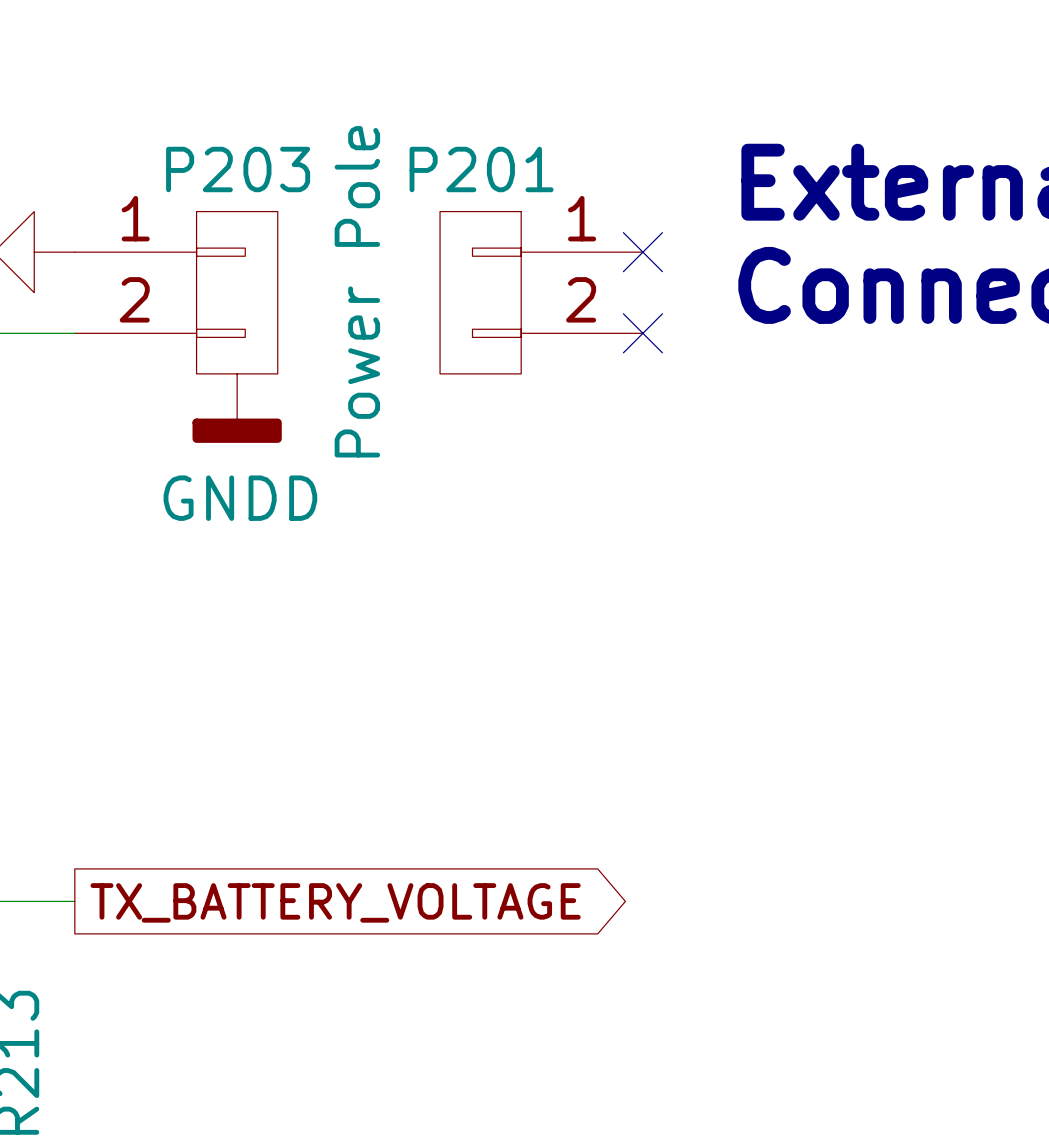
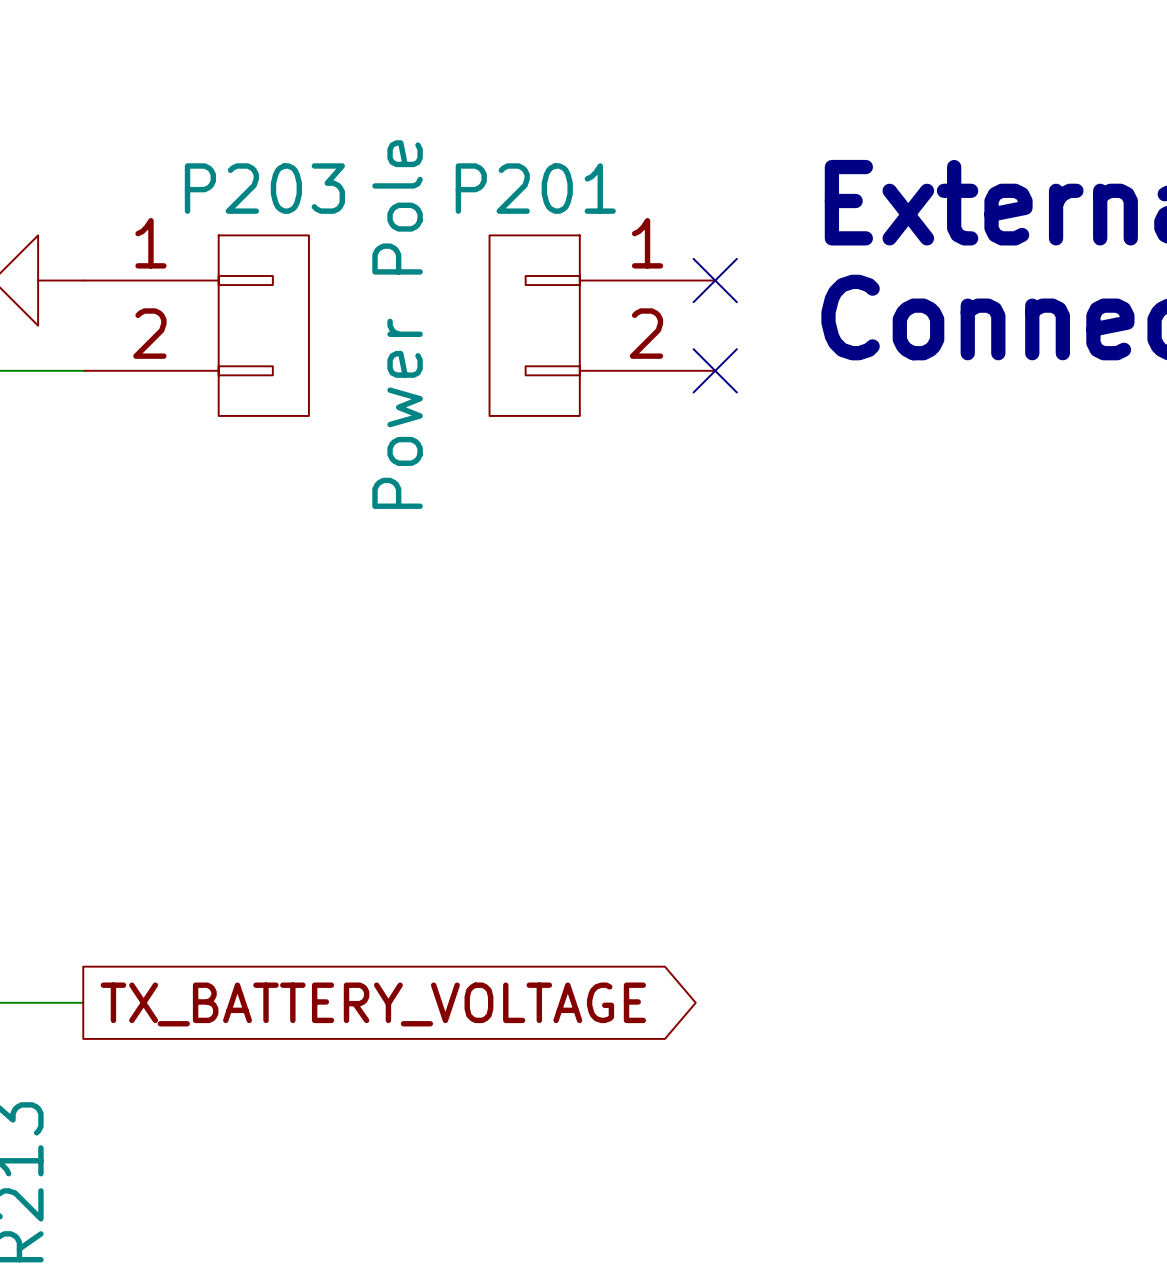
power symbol: GNDD (237, 408) -> none

